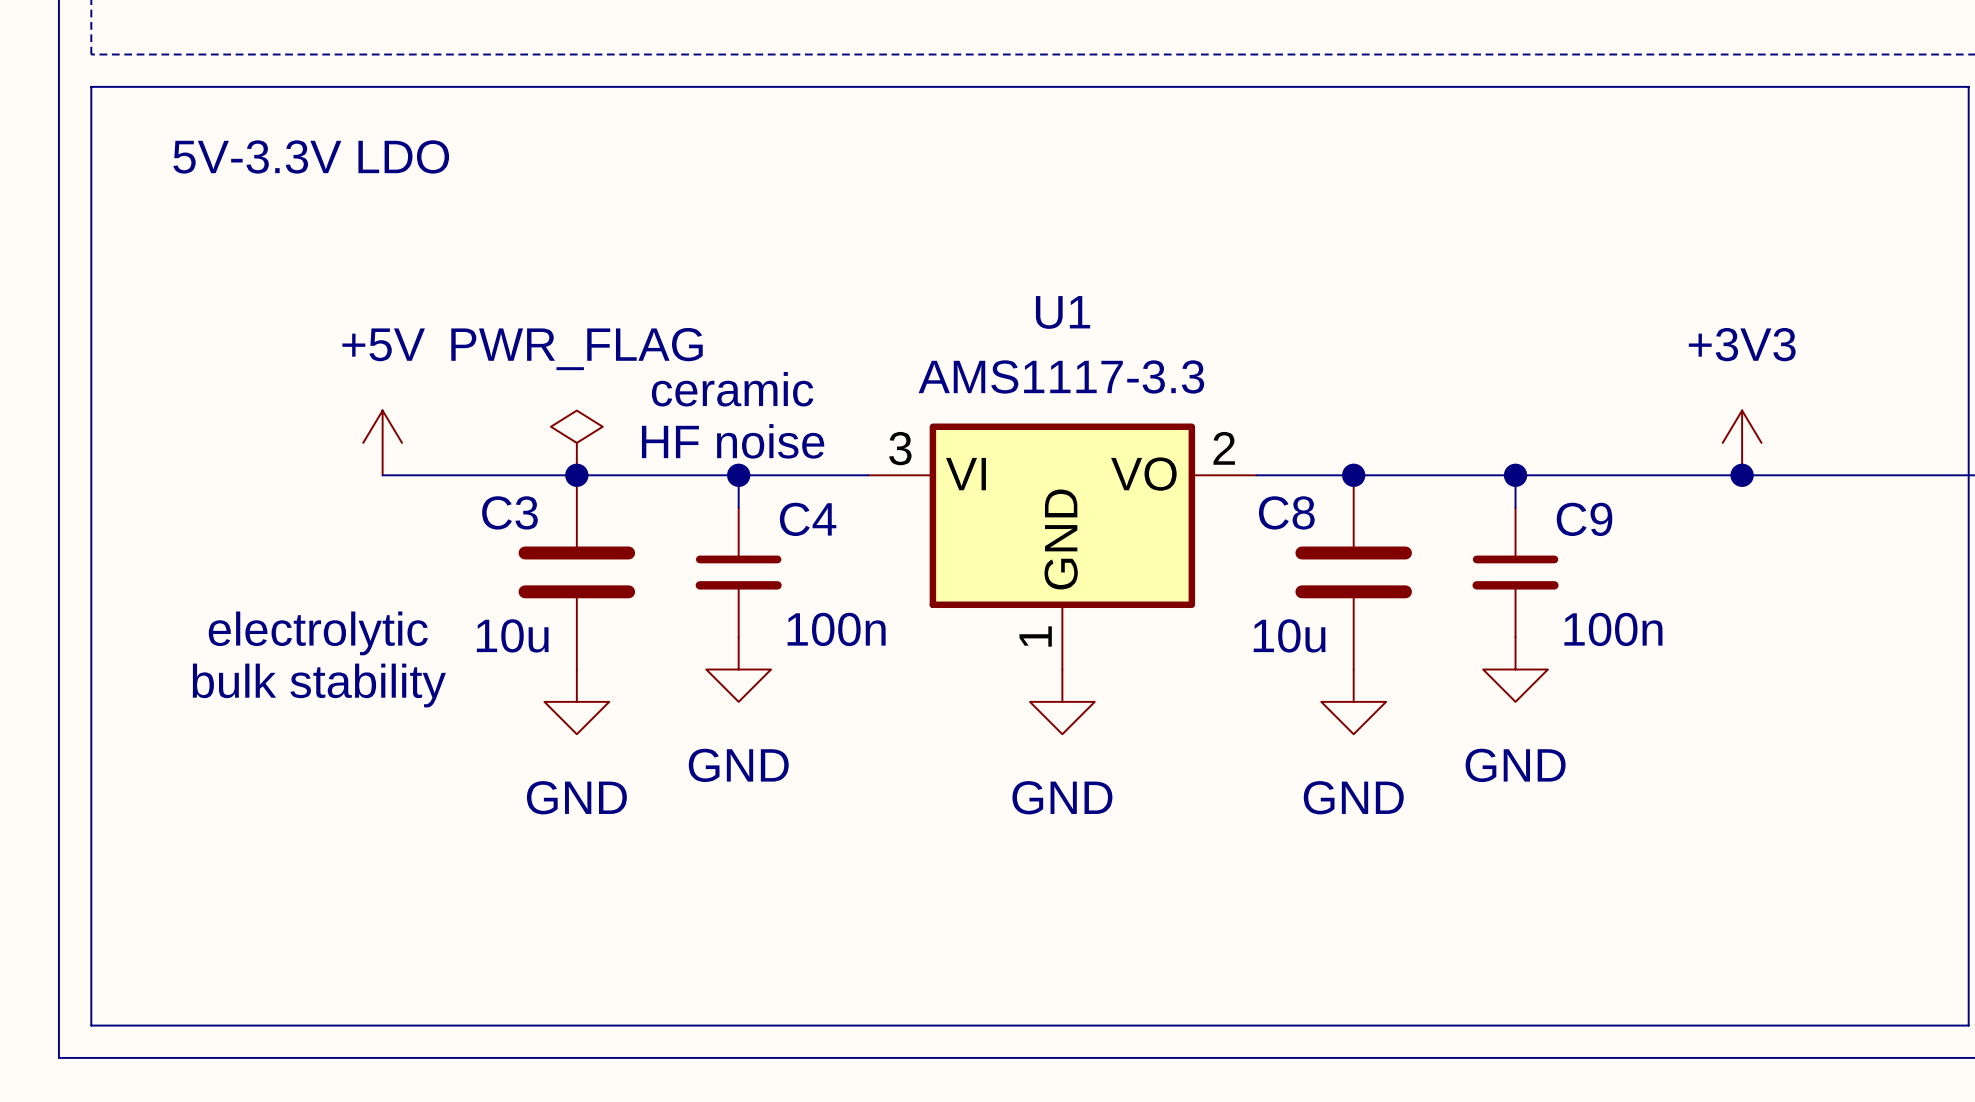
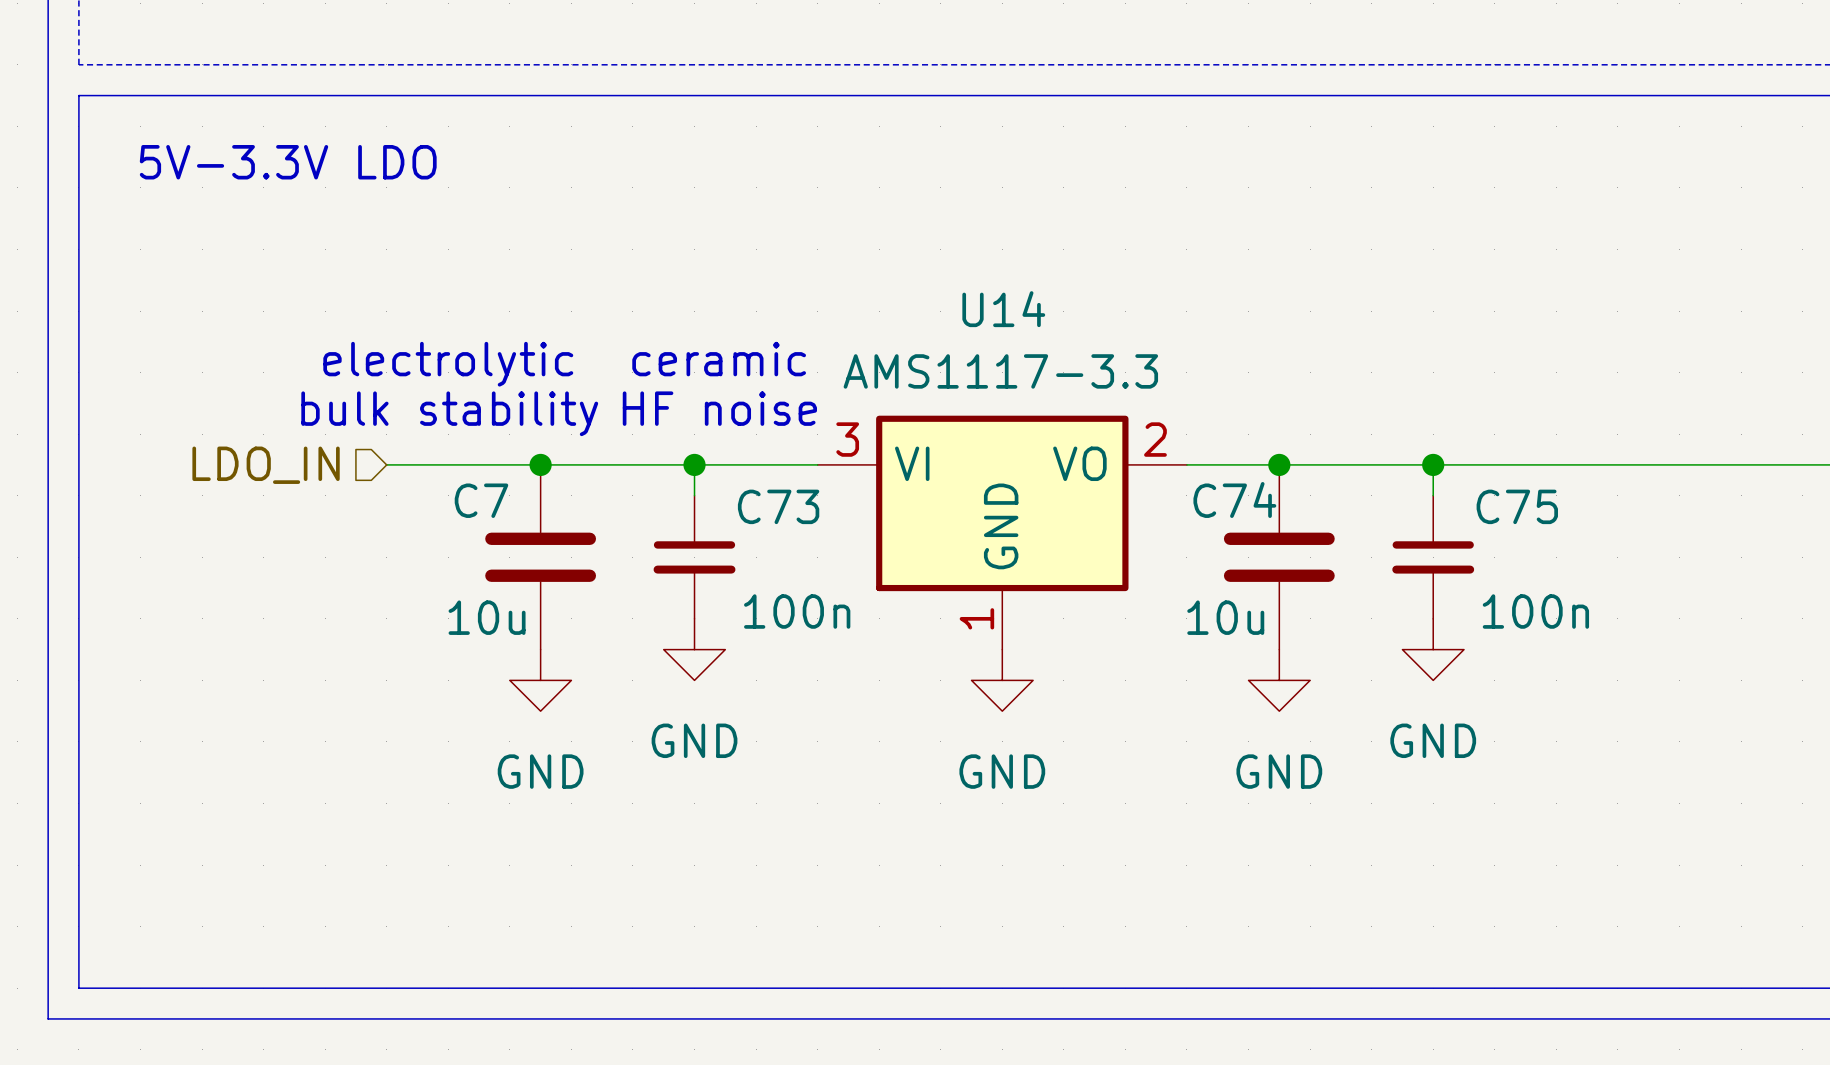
U1 name: U1 (1063, 312) -> U14 (1003, 309)
text position: ceramic (732, 389) -> ceramic (719, 359)
text position: HF noise (733, 441) -> HF noise (719, 408)
power symbol: +5V (382, 442) -> none
power symbol: PWR_FLAG (576, 442) -> none
power symbol: +3V3 (1742, 442) -> none
wire: (382, 475) (414, 475) -> none
junction: (1742, 475) -> none
hierarchical label: none -> LDO_IN (266, 465)
C3 name: C3 (509, 512) -> C7 (481, 500)
C8 name: C8 (1286, 512) -> C74 (1234, 499)
C4 name: C4 (808, 519) -> C73 (778, 506)
C9 name: C9 (1584, 519) -> C75 (1517, 506)
text position: electrolytic (318, 633) -> electrolytic (448, 364)
text position: bulk stability (319, 685) -> bulk stability (449, 413)

